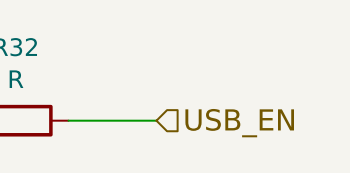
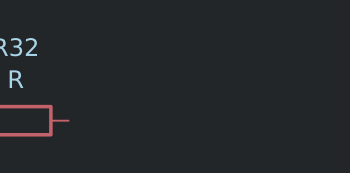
wire: (68, 120) (156, 120) -> none
hierarchical label: USB_EN (239, 123) -> none

